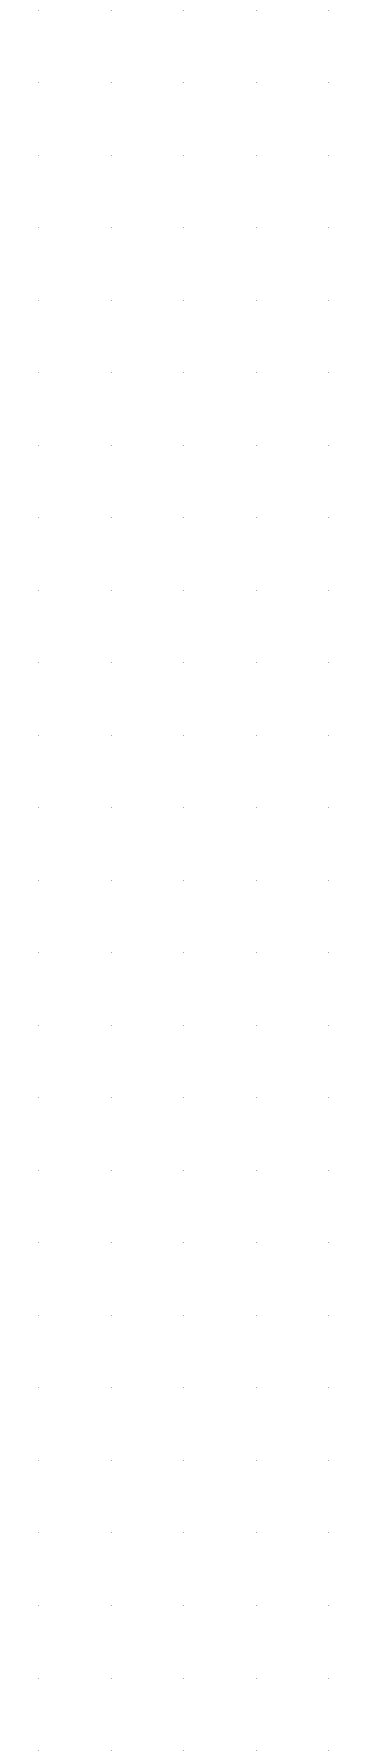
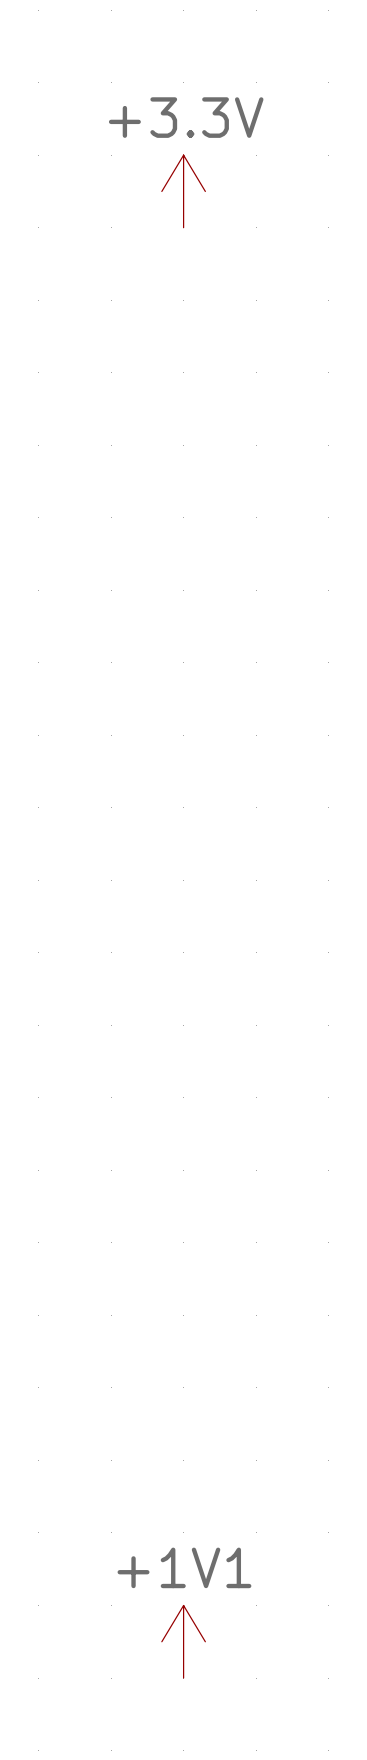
power symbol: none -> +3.3V (183, 191)
power symbol: none -> +1V1 (183, 1641)

